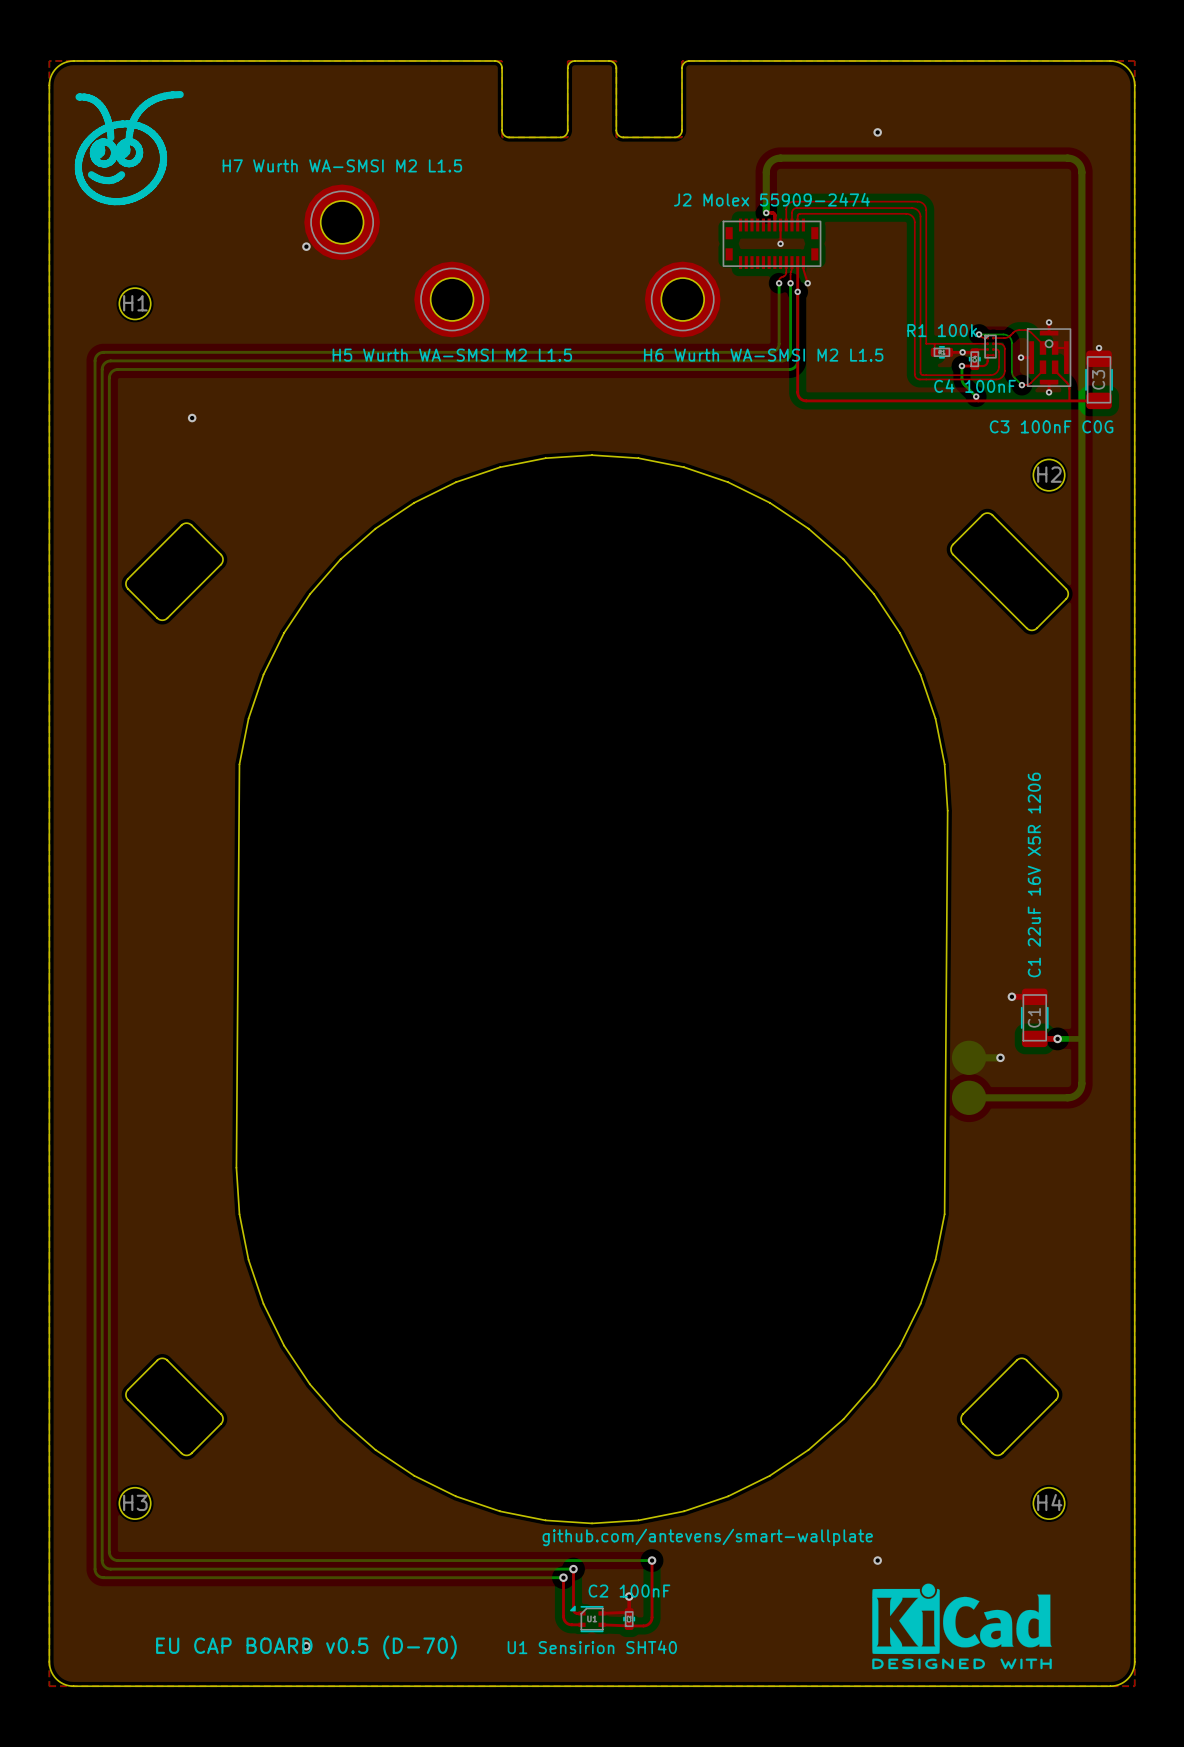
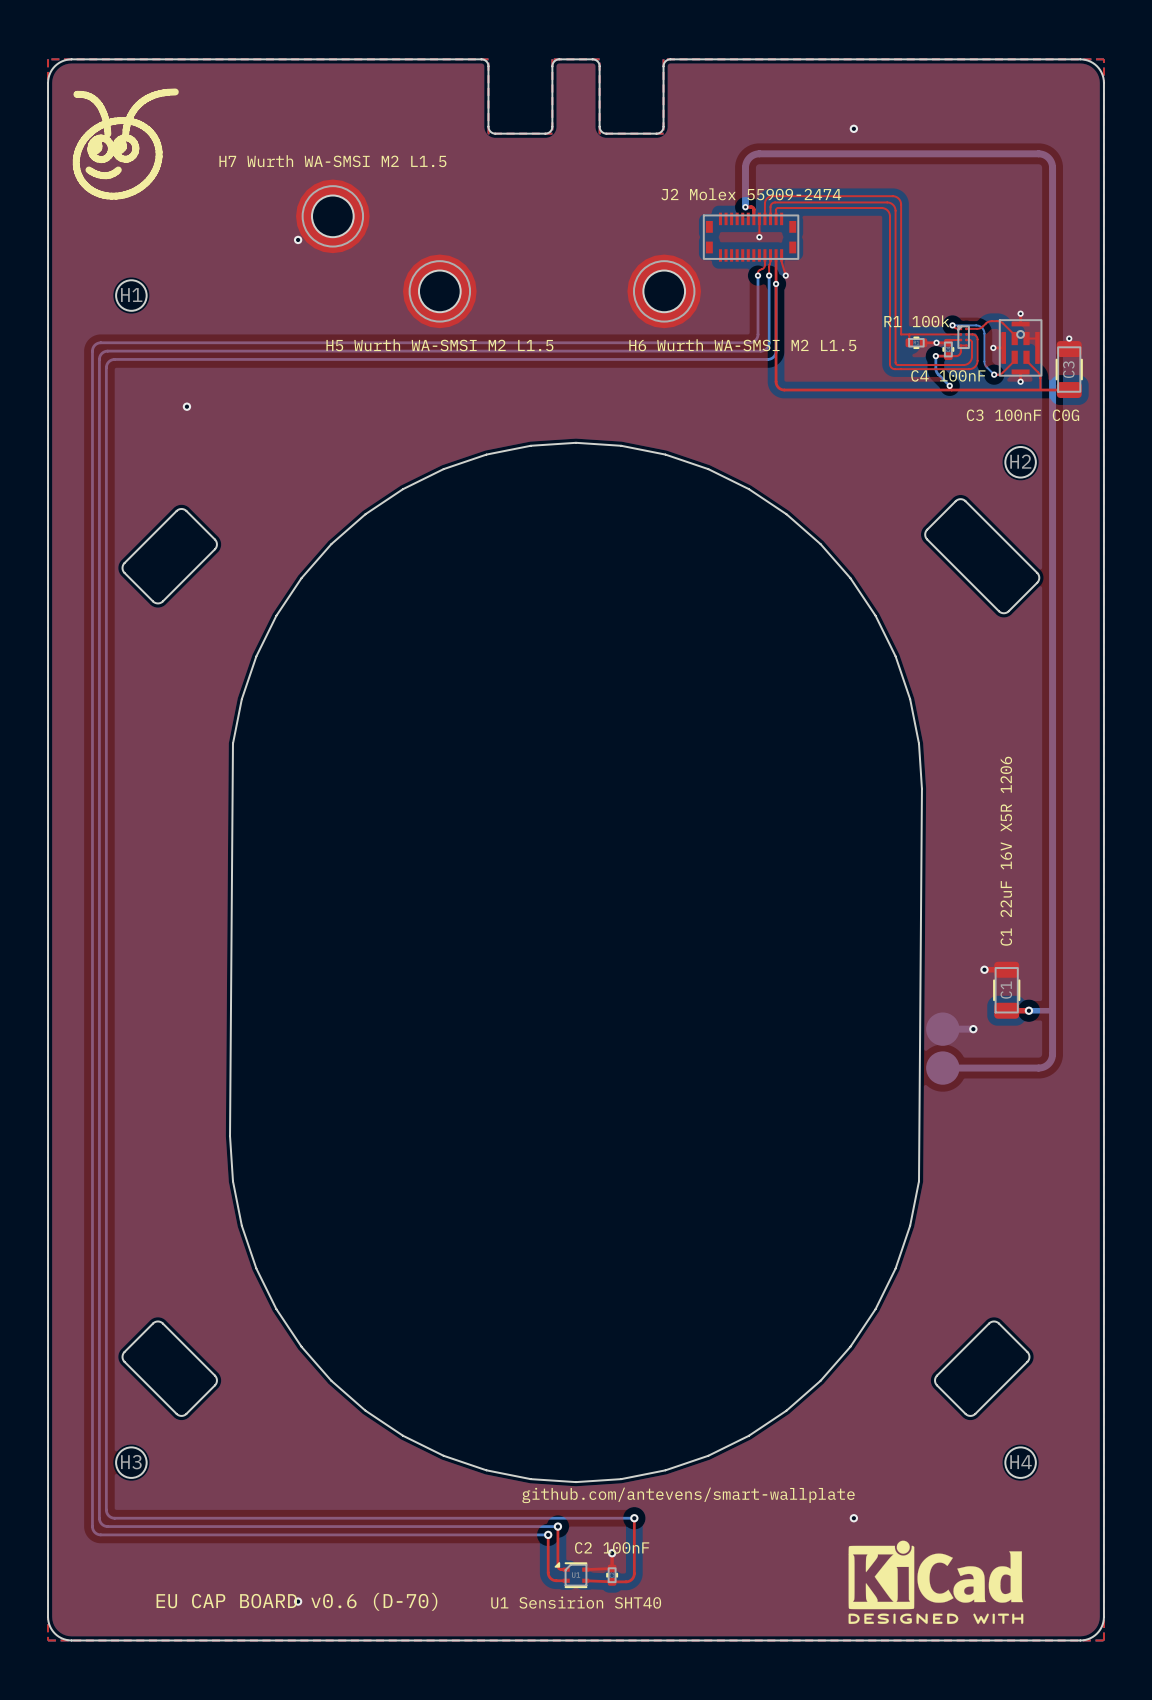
text: EU CAP BOARD v0.5 (D-70) (306, 1647) -> EU CAP BOARD v0.6 (D-70) (296, 1601)

